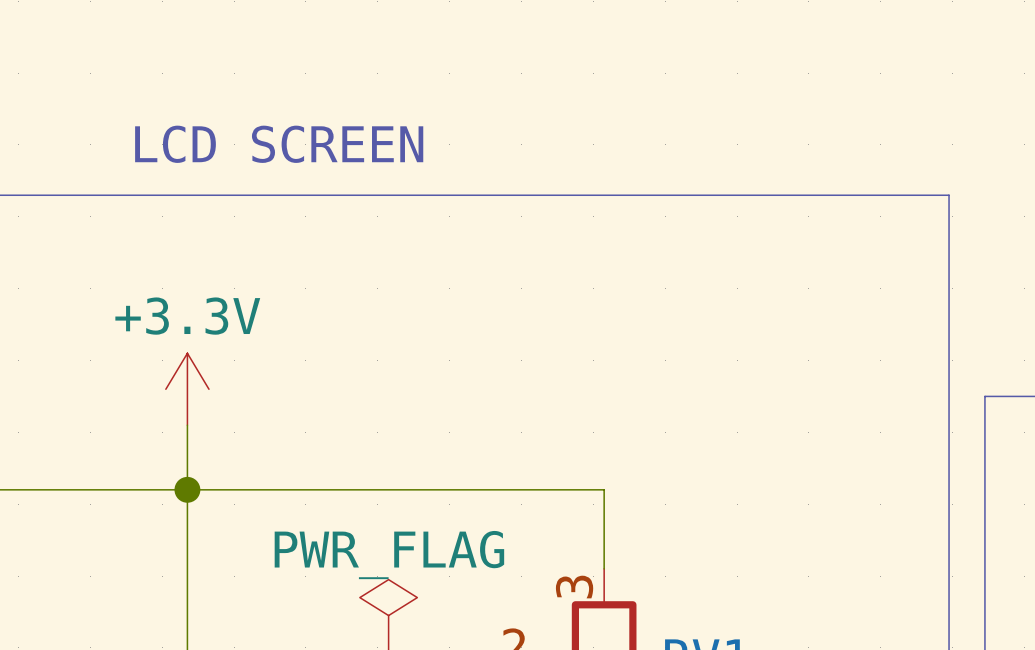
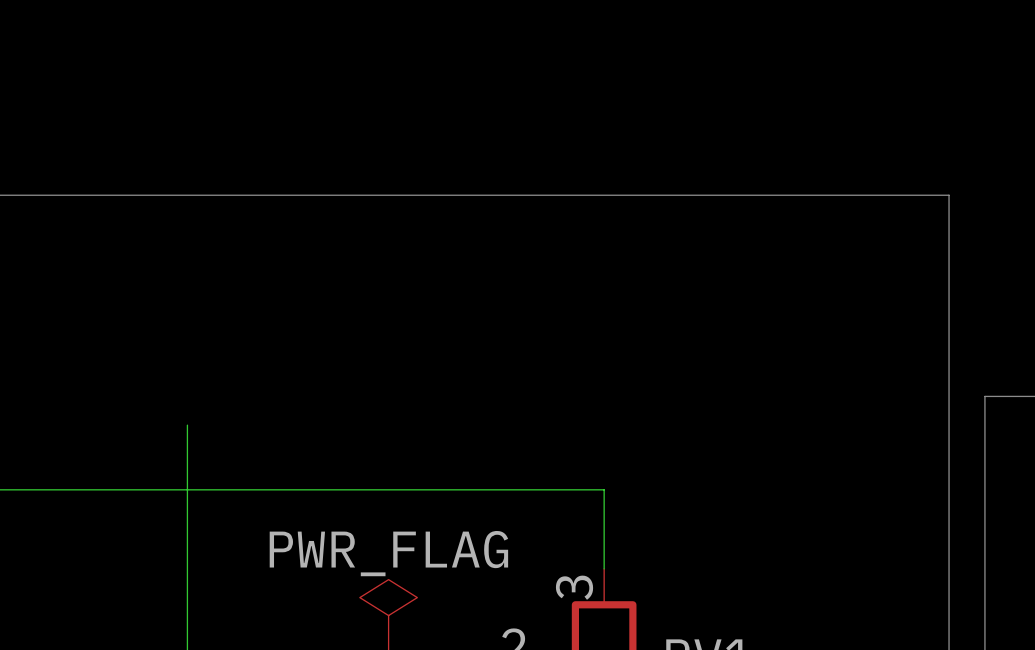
text: LCD SCREEN (279, 144) -> none
power symbol: +3.3V (187, 389) -> none
junction: (187, 489) -> none

